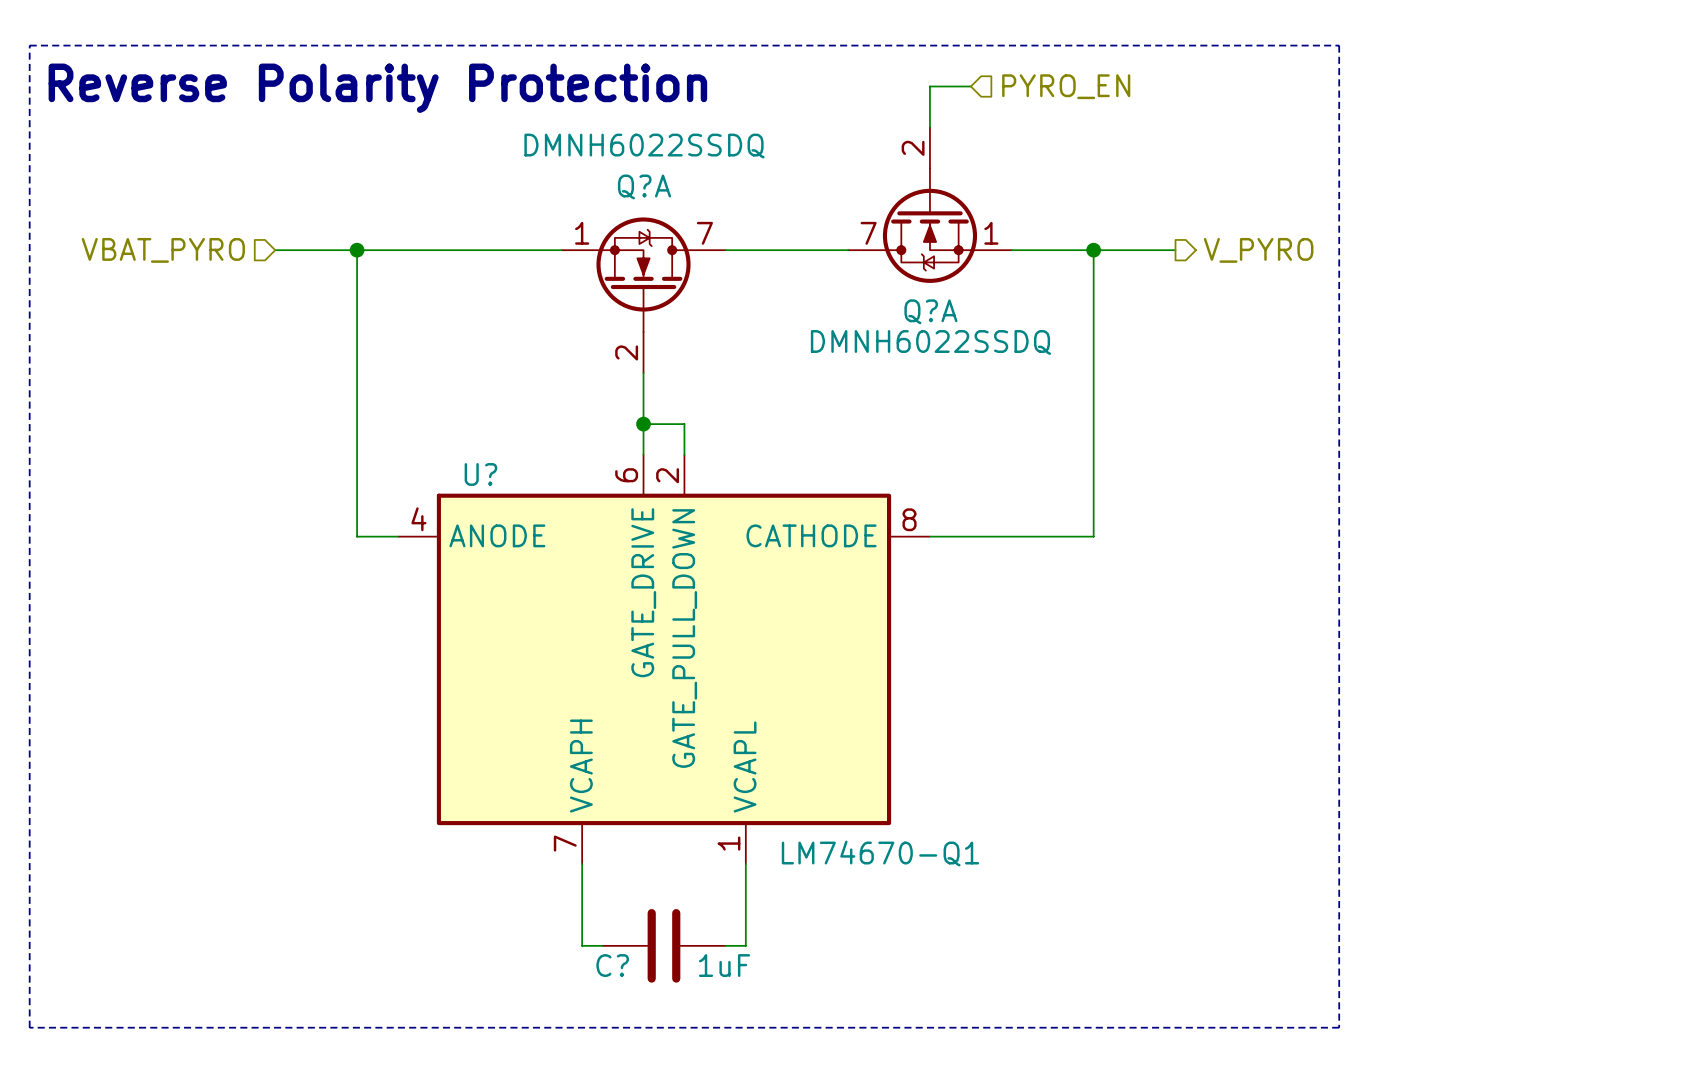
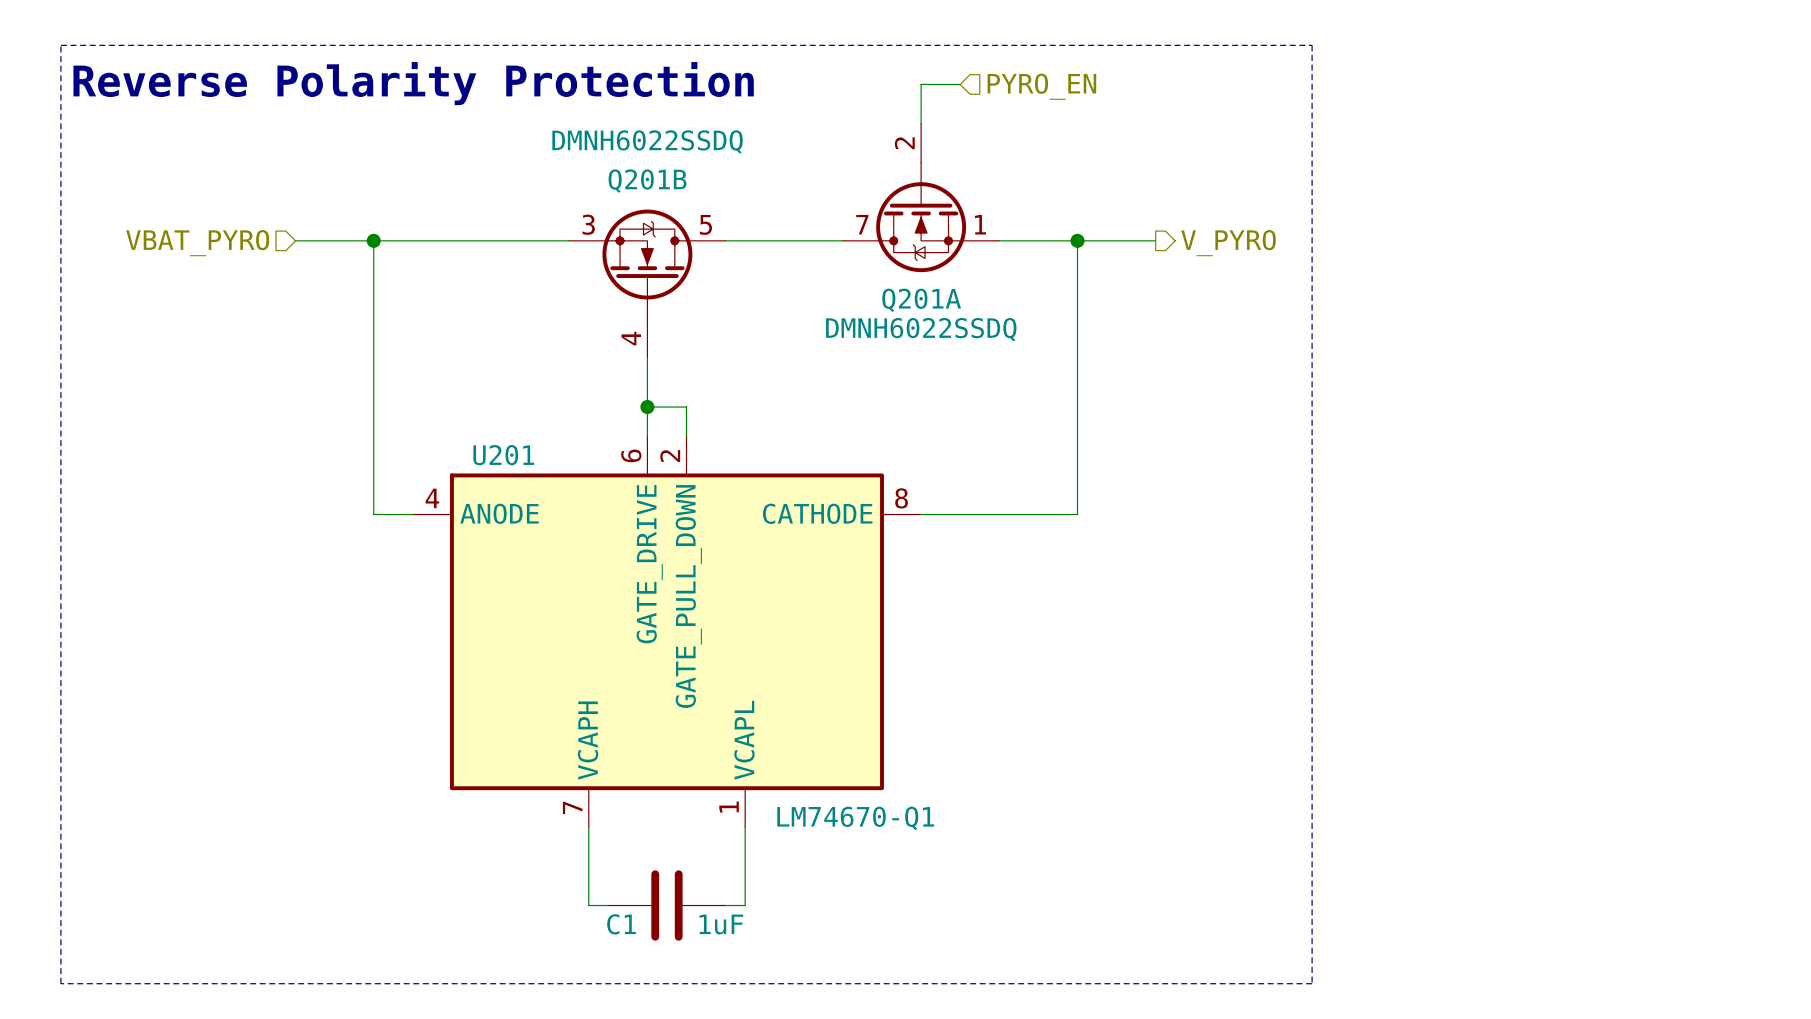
Q?A name: Q?A (644, 186) -> Q201B (647, 181)
Q?A pin number: 1 (582, 233) -> 3 (588, 224)
Q?A pin number: 7 (704, 233) -> 5 (705, 224)
Q?A name: Q?A (930, 311) -> Q201A (921, 300)
Q?A pin number: 2 (626, 352) -> 4 (631, 338)
U? name: U? (480, 474) -> U201 (503, 455)
C? name: C? (612, 965) -> C1 (621, 924)

